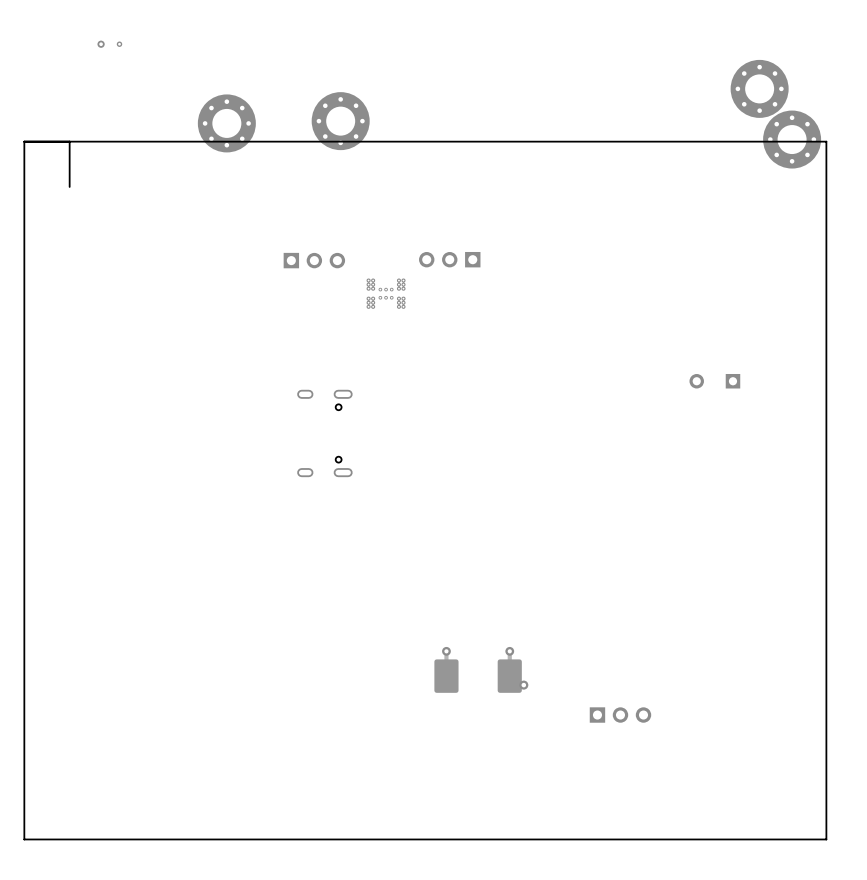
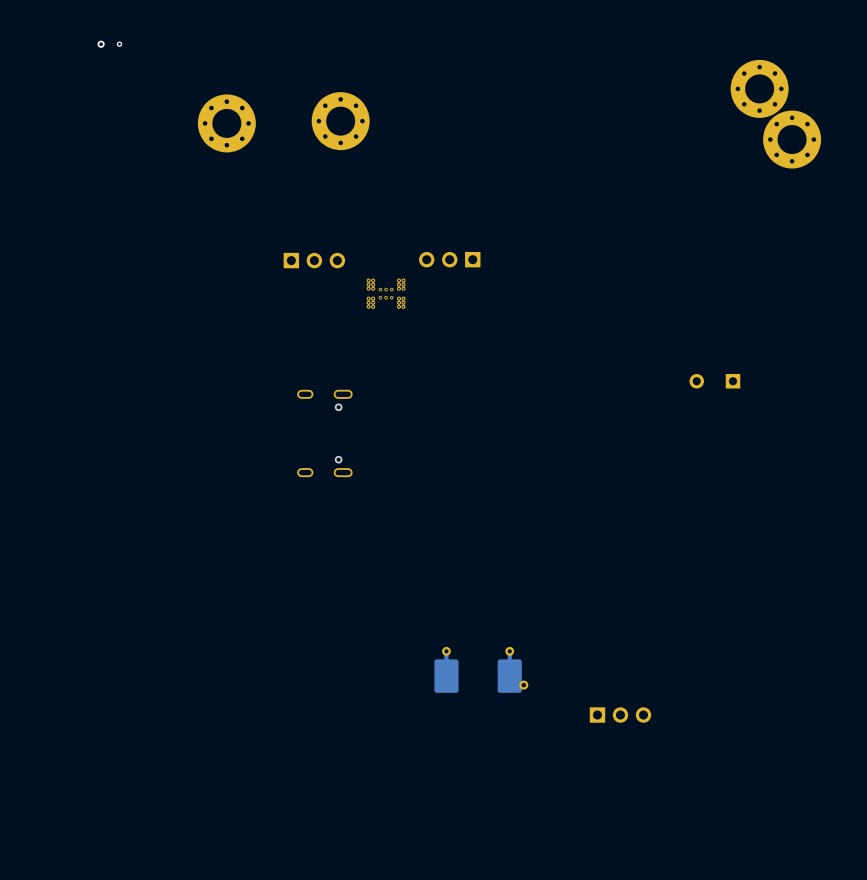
board edge: (69, 141) (69, 186) -> none
board edge: (826, 141) (24, 141) (24, 839) (826, 839) (826, 141) -> none

